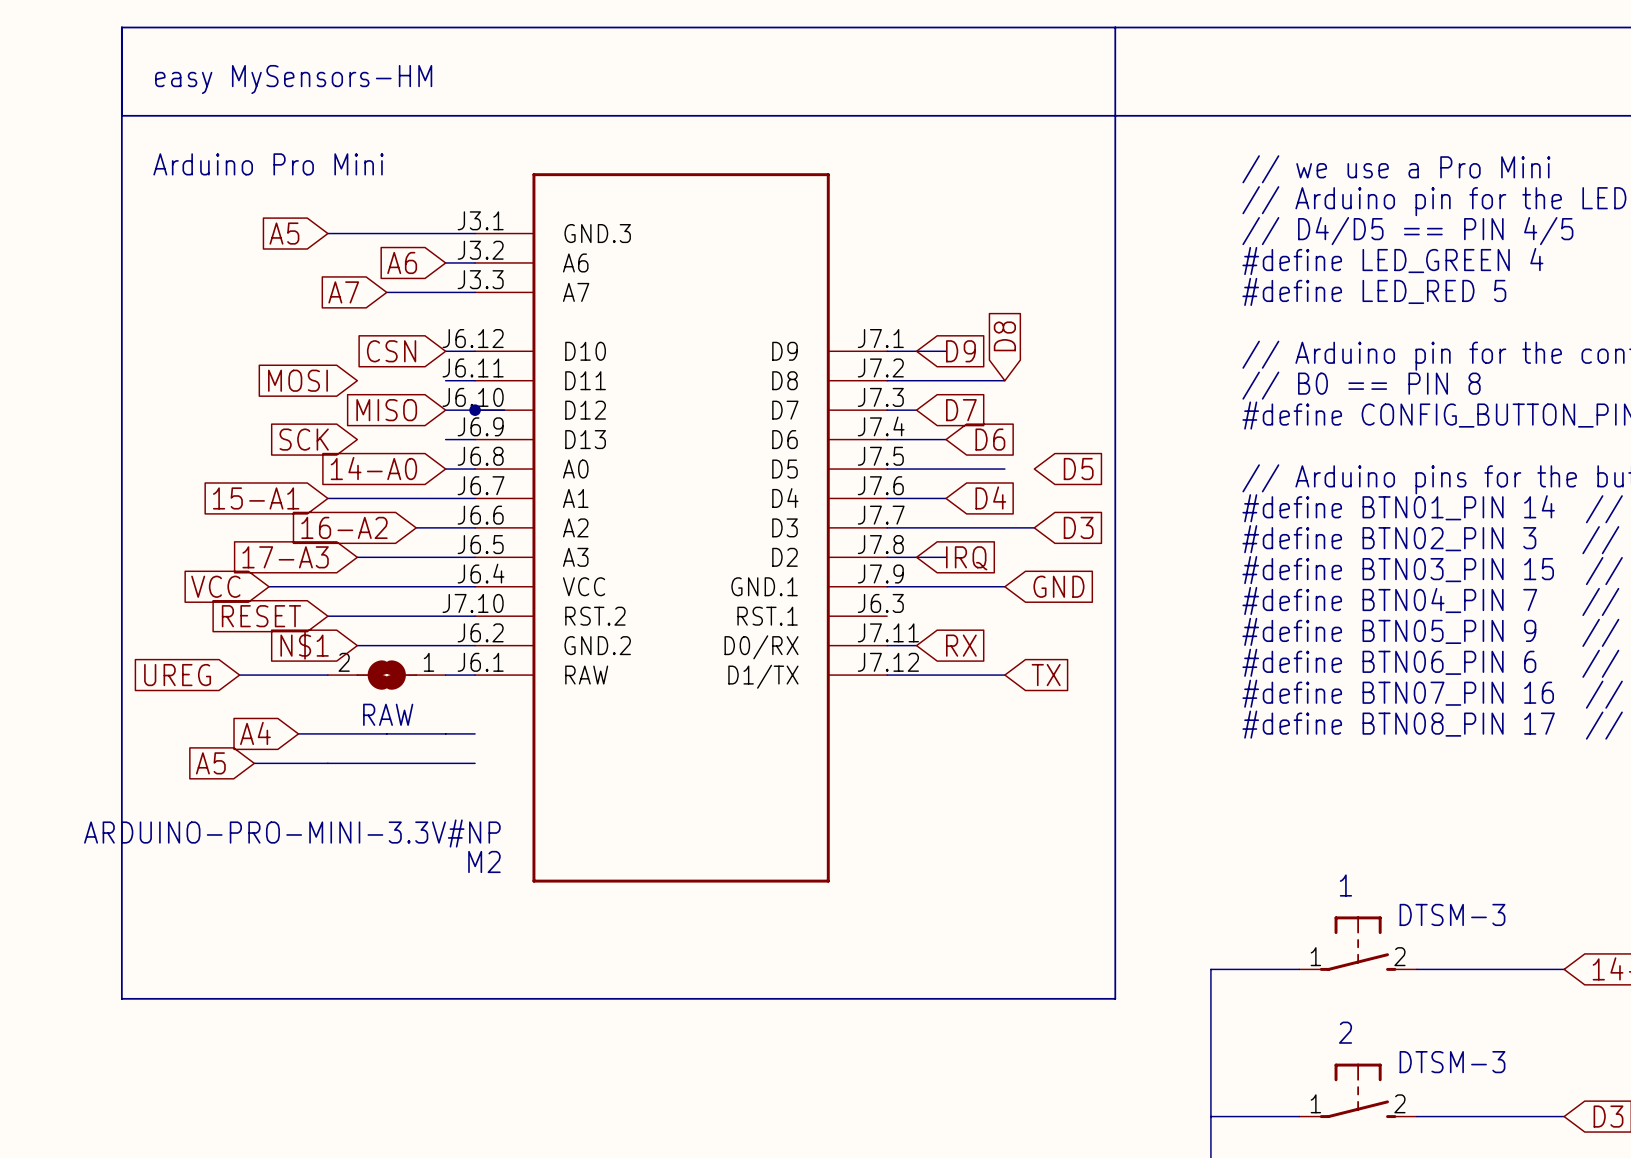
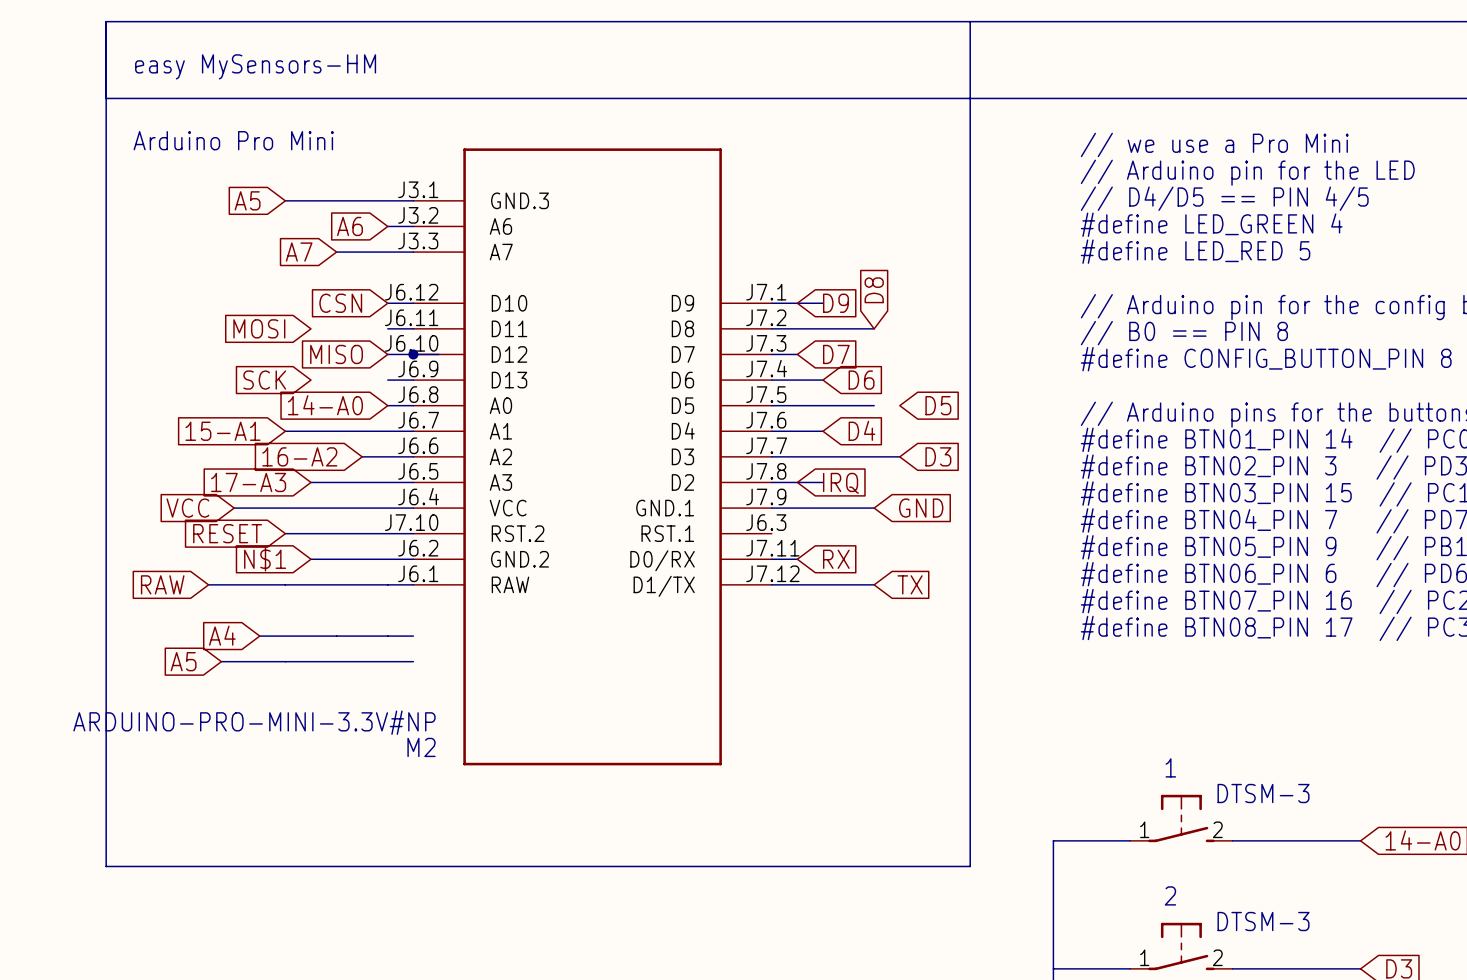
global label: UREG (177, 675) -> RAW (162, 584)
RAW: (386, 675) -> none

